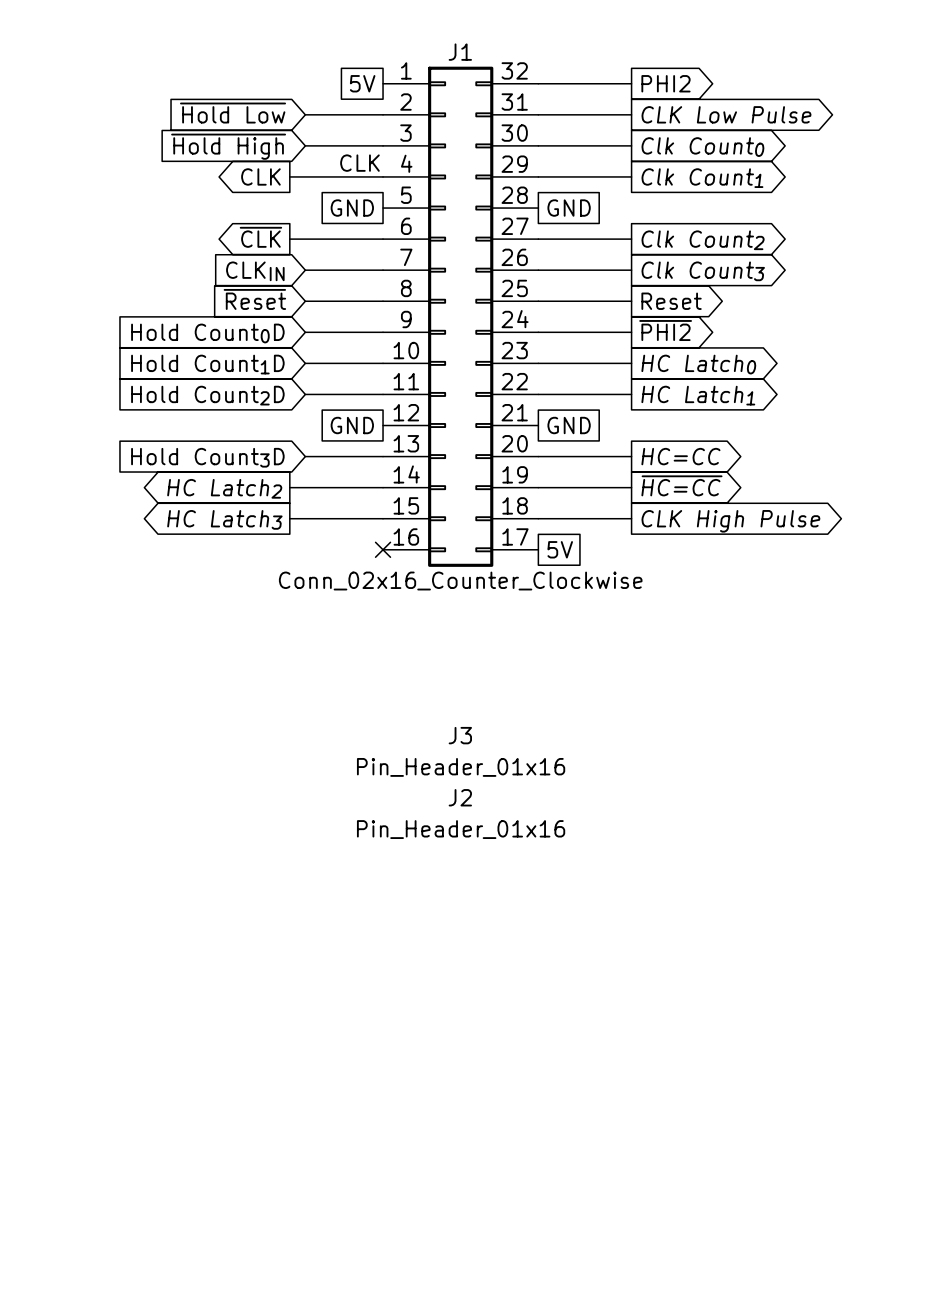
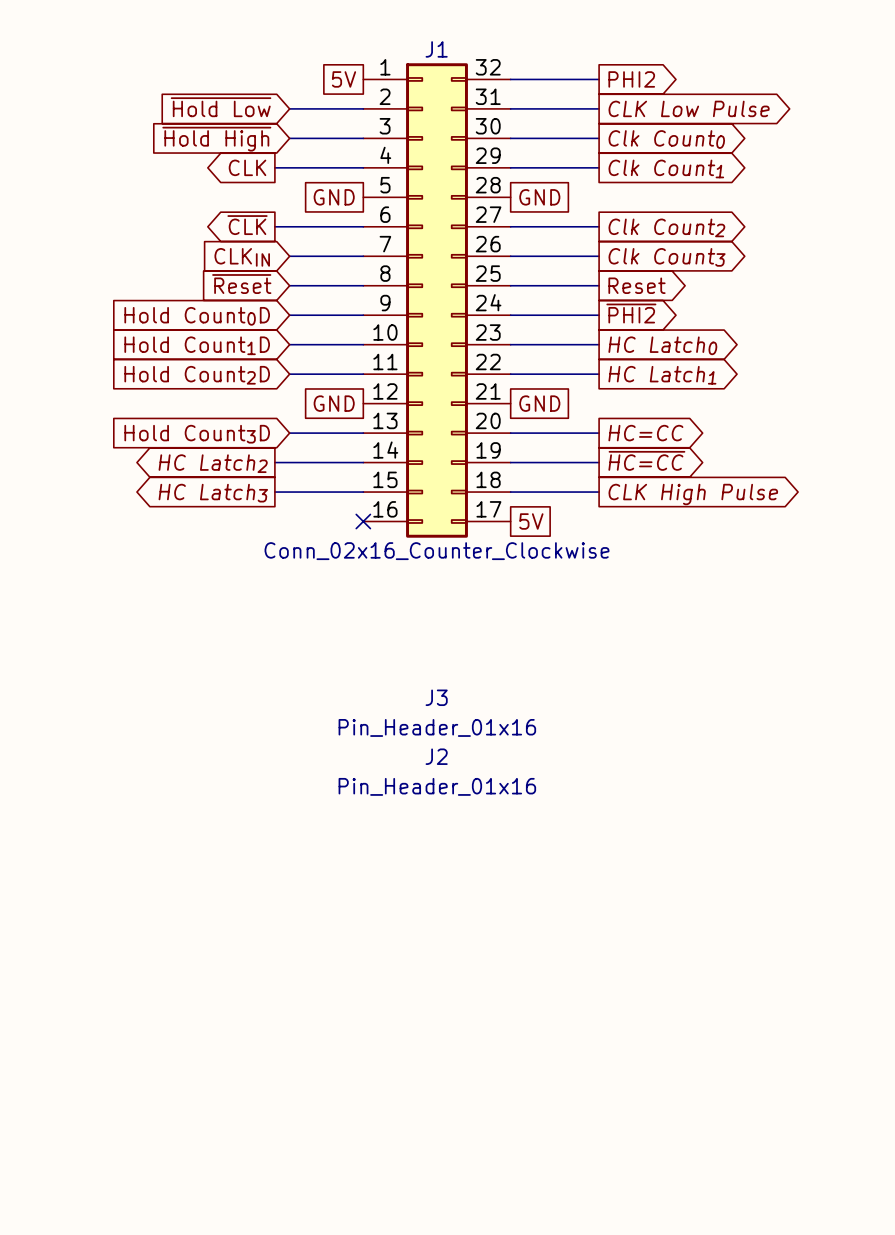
label: CLK (359, 163) -> none

